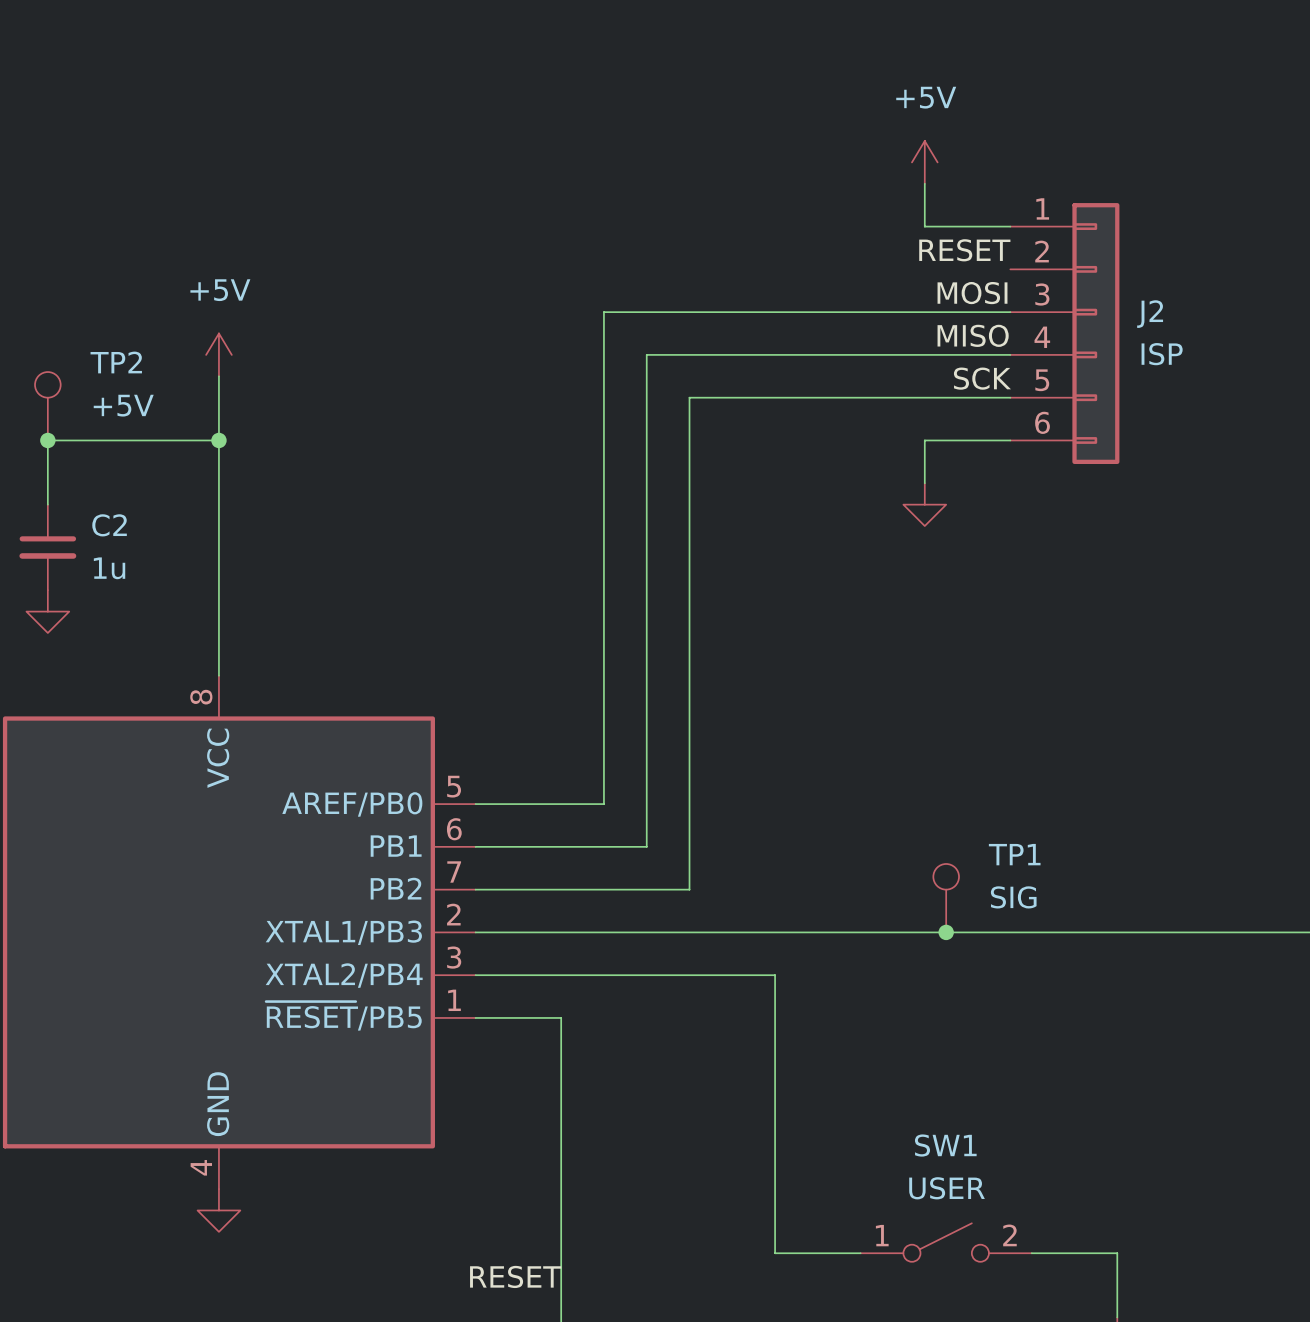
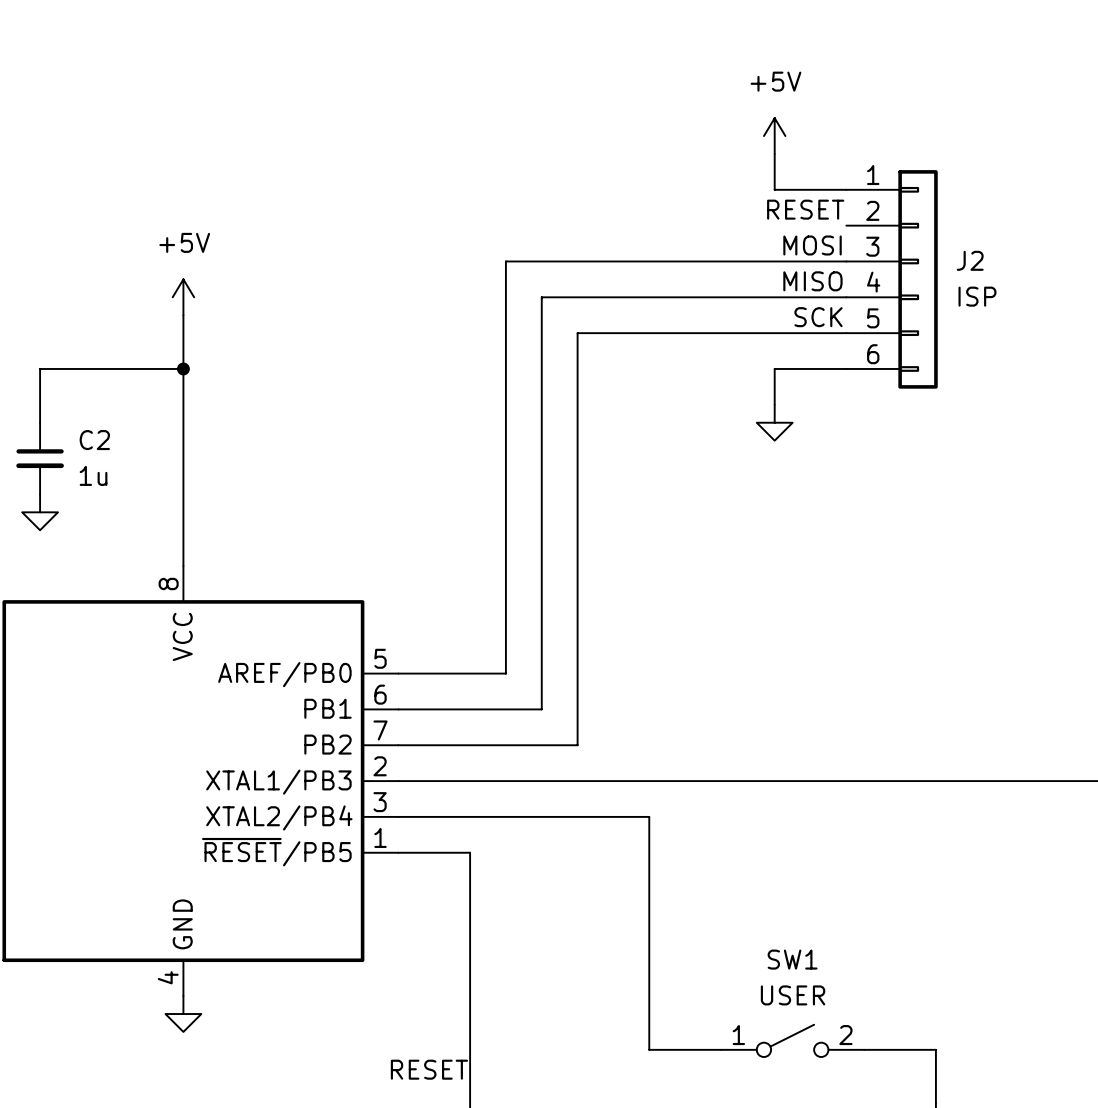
TP2: +5V (47, 406) -> none
junction: (47, 440) -> none
TP1: SIG (946, 898) -> none
junction: (946, 932) -> none

